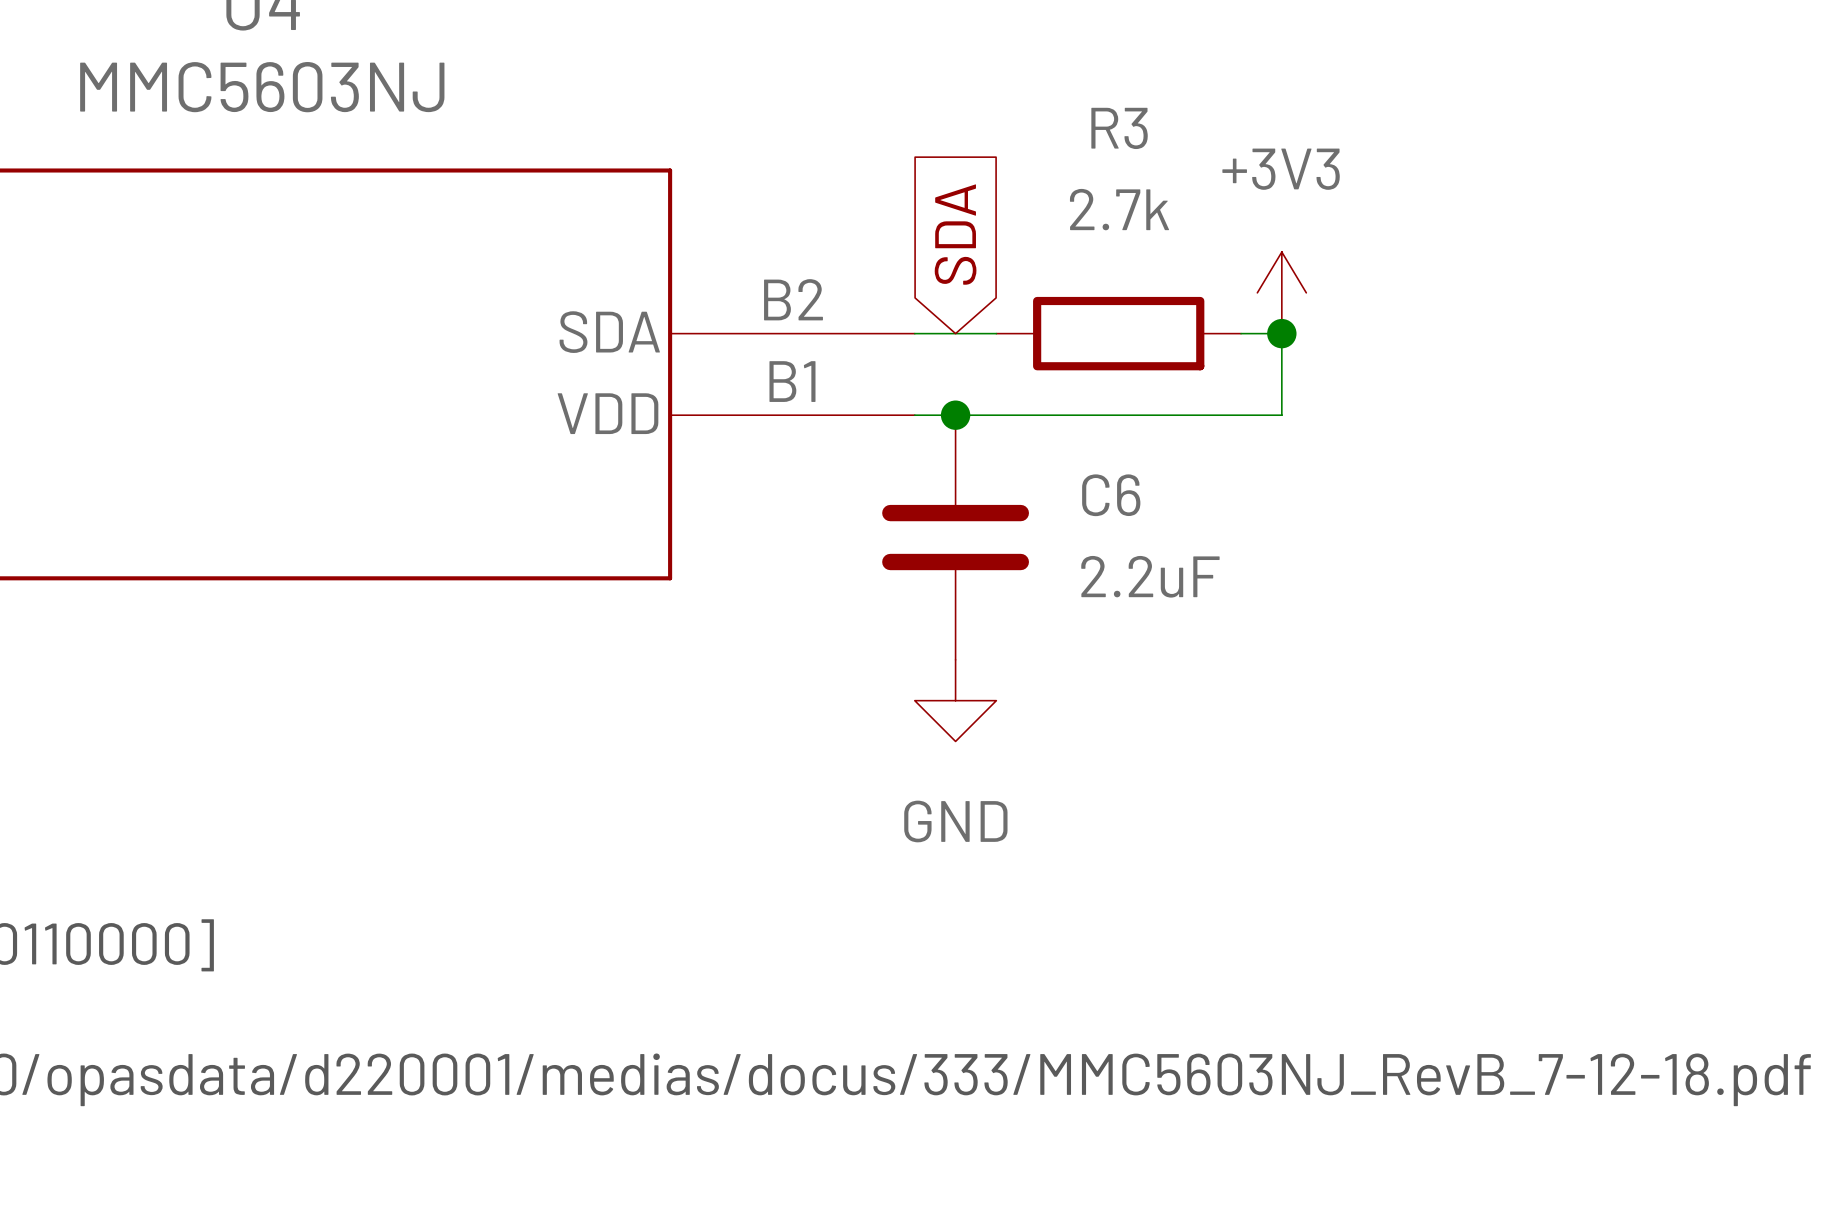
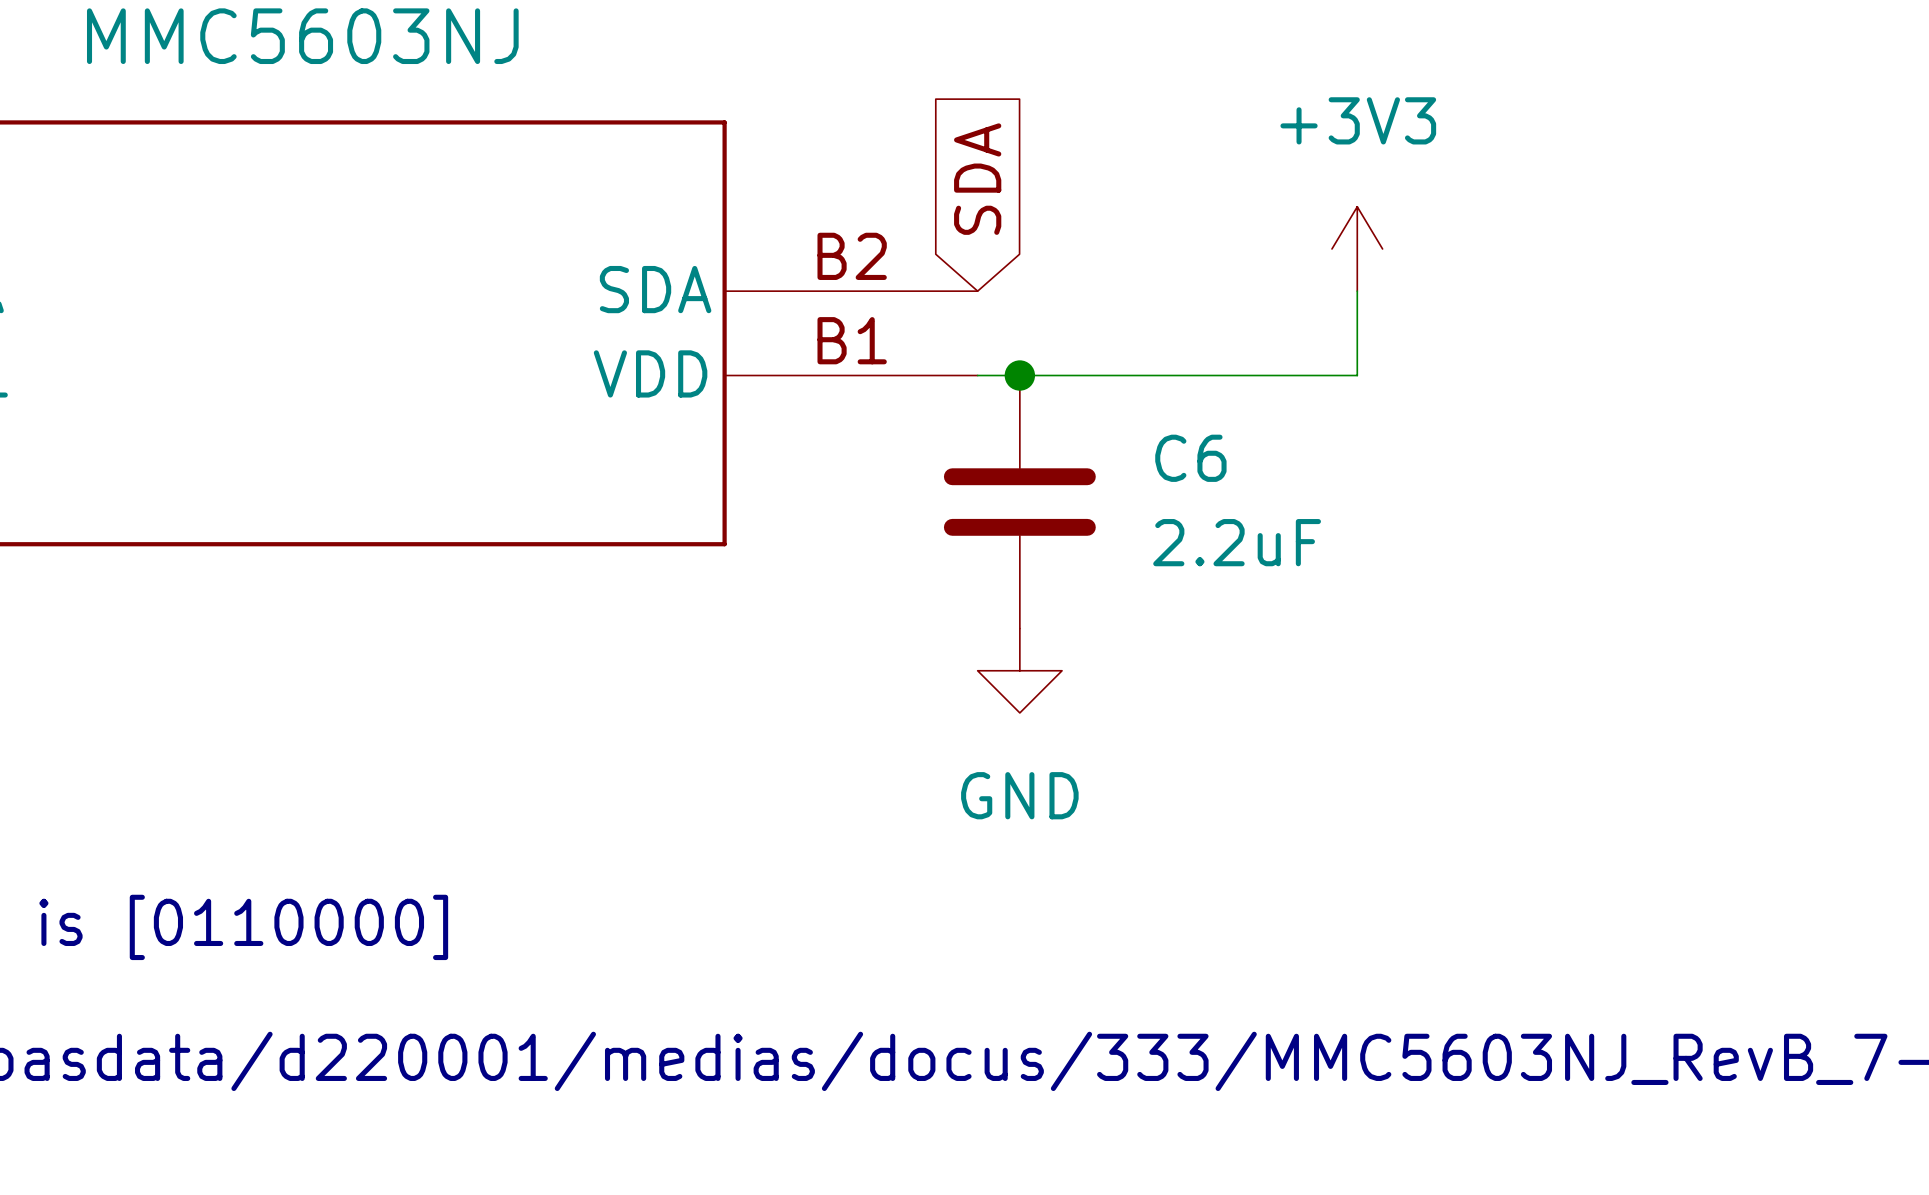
global label position: SDA (955, 234) -> SDA (977, 179)
wire: (914, 333) (996, 333) -> none
R3: 2.7k (1118, 333) -> none
wire: (1241, 333) (1281, 333) -> none
junction: (1281, 333) -> none

